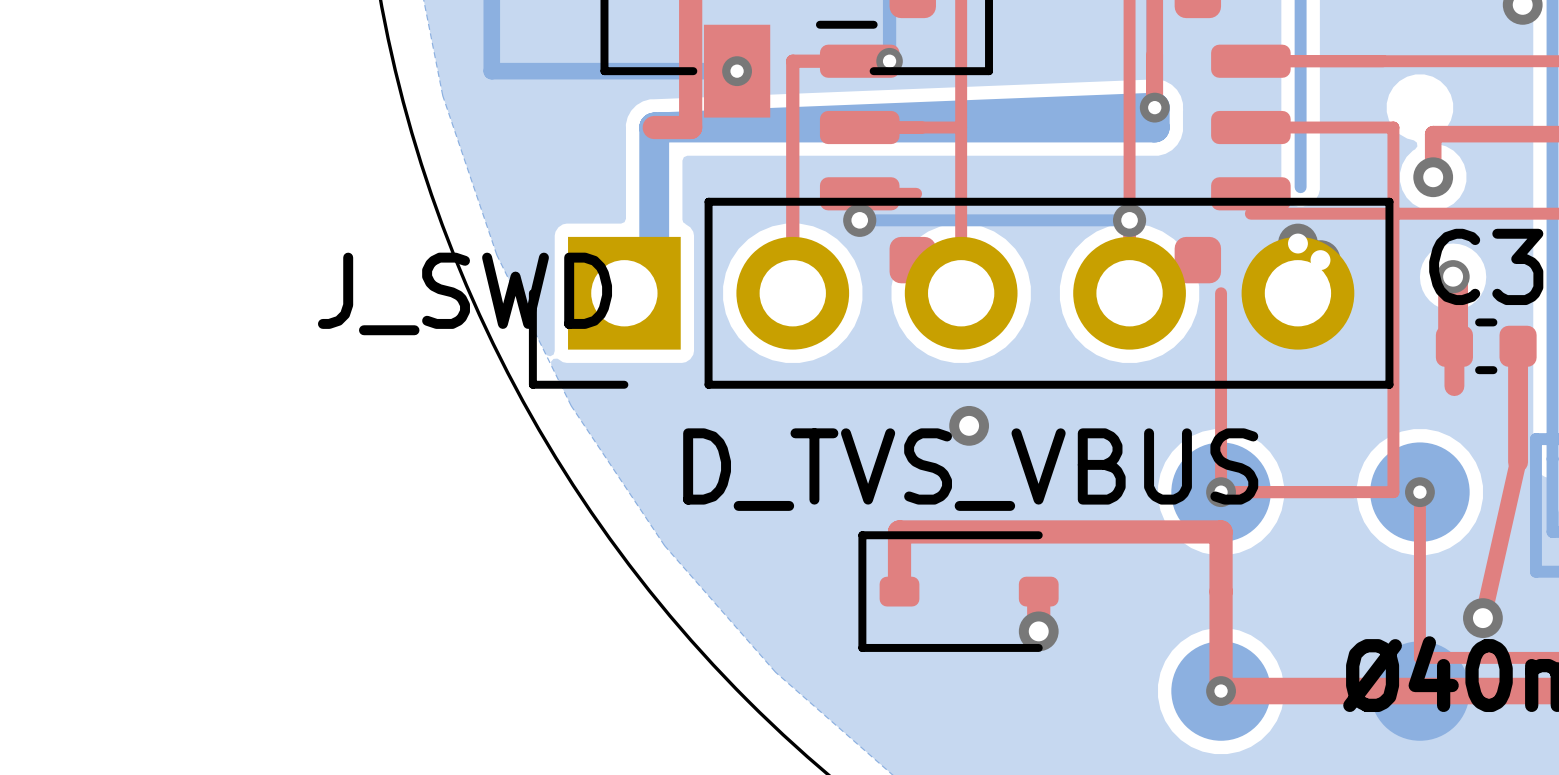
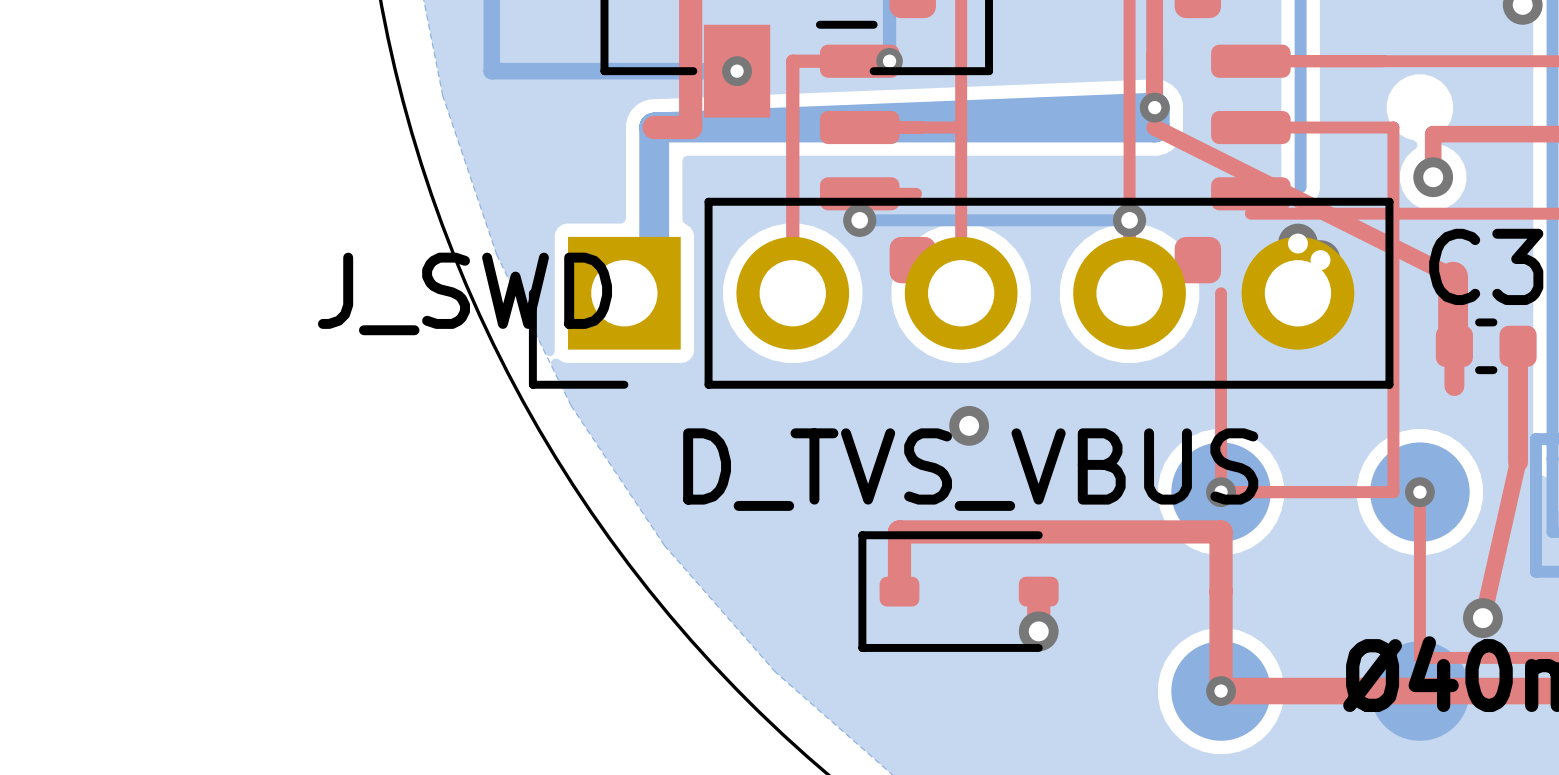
top track: none -> (1154, 127) (1453, 276)
via: (1453, 276) -> none

